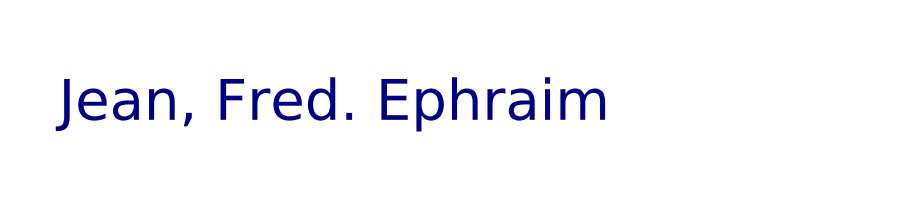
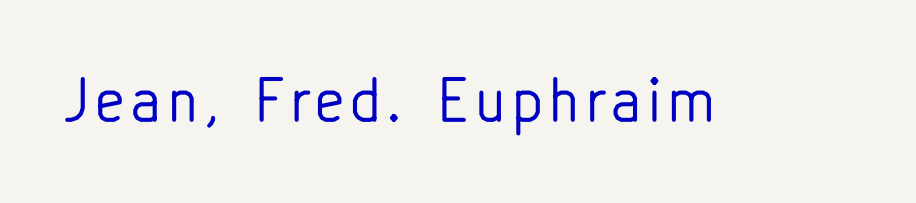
text: Jean, Fred. Ephraim (330, 104) -> Jean, Fred. Euphraim (388, 106)

